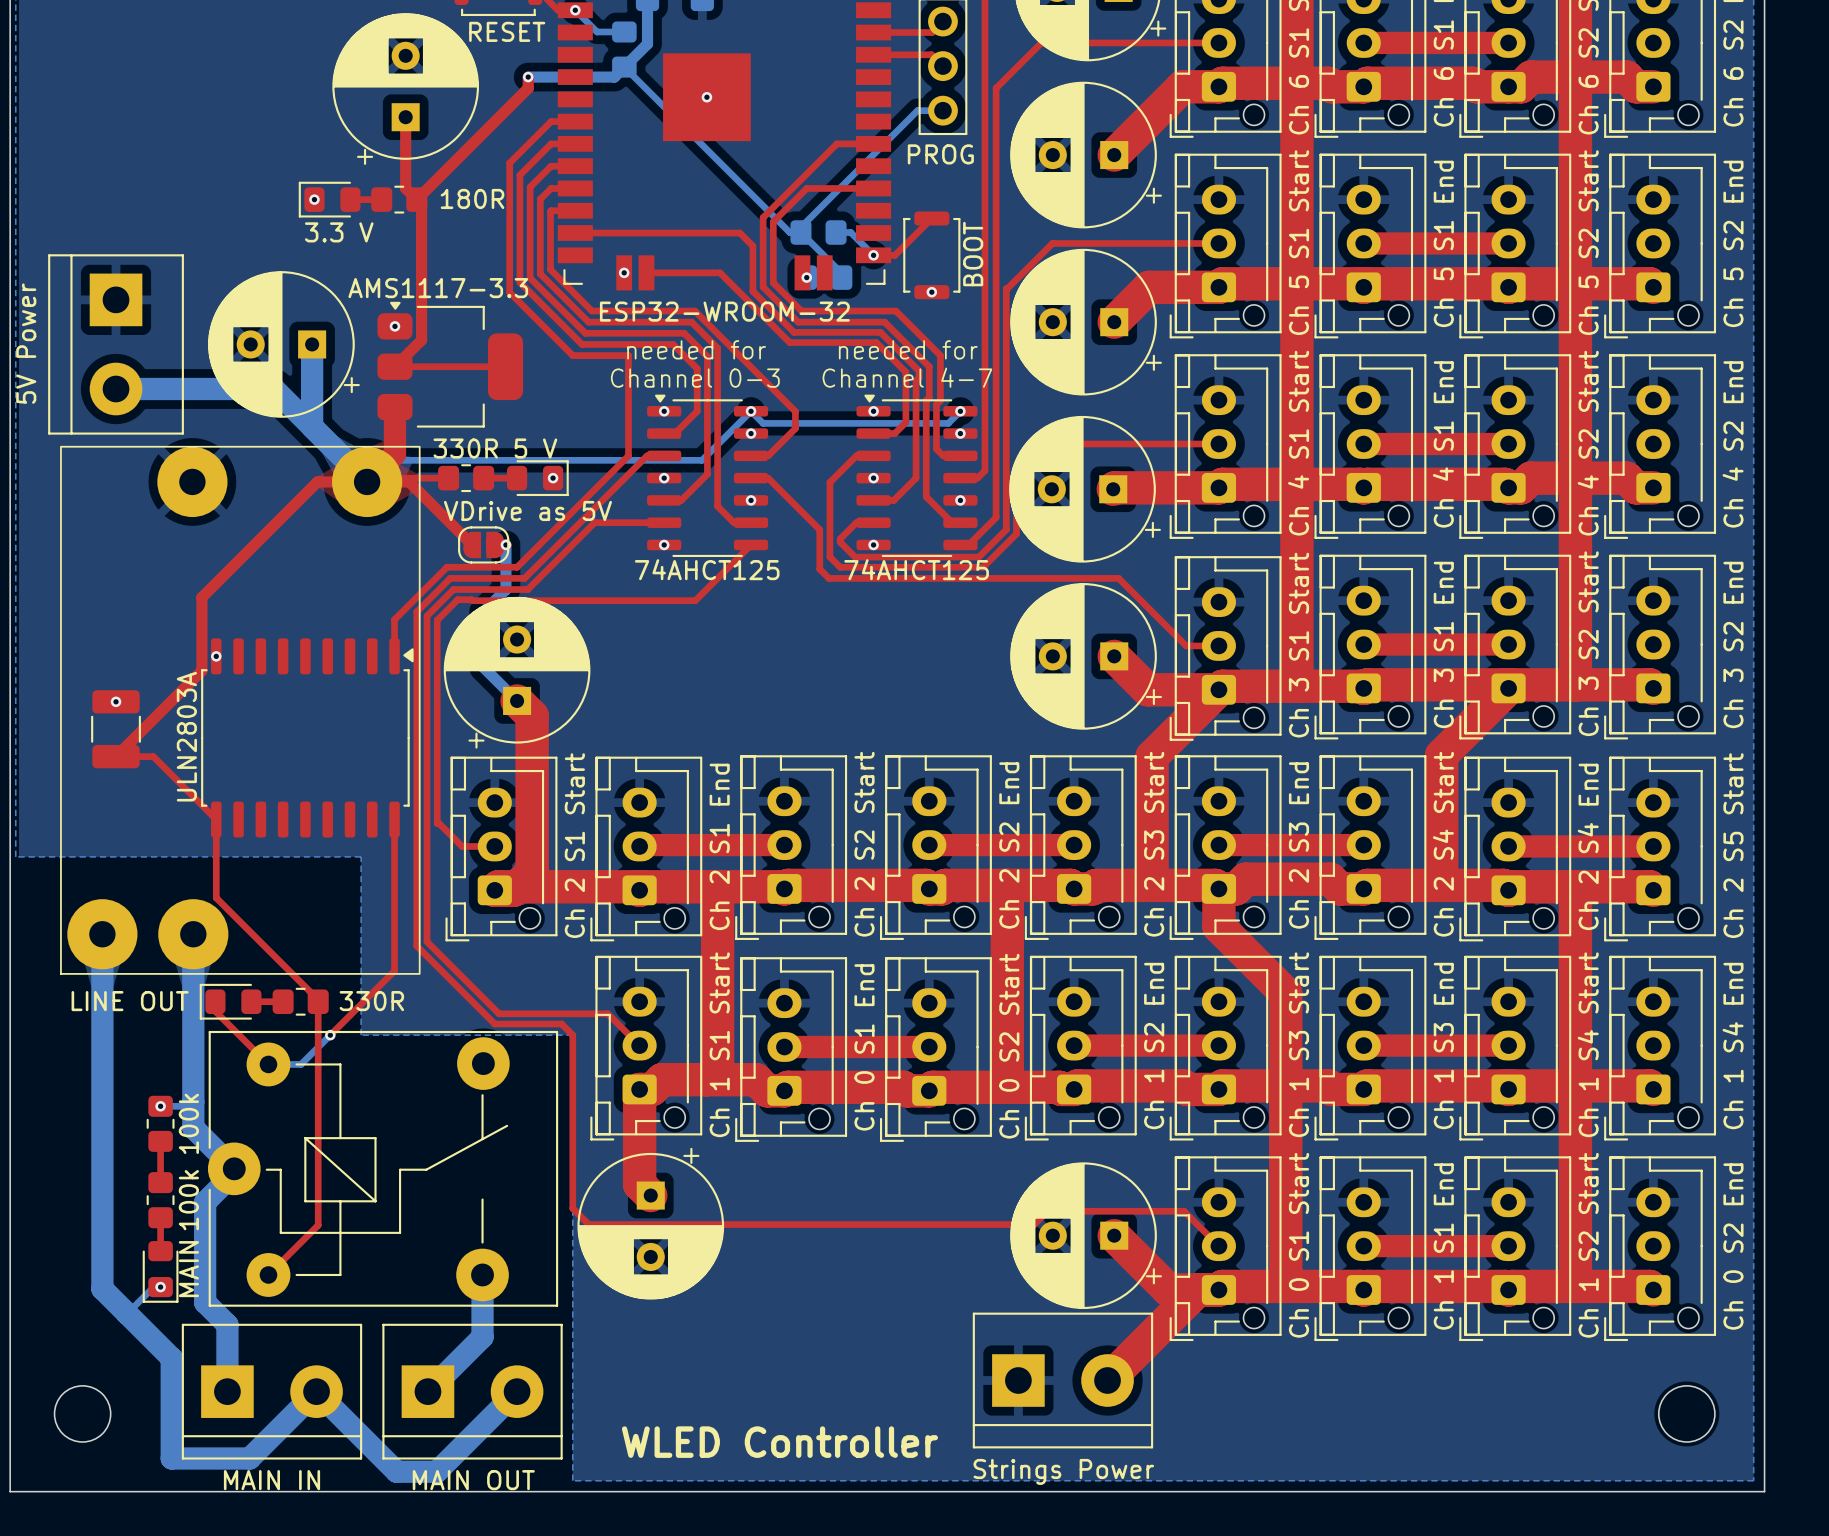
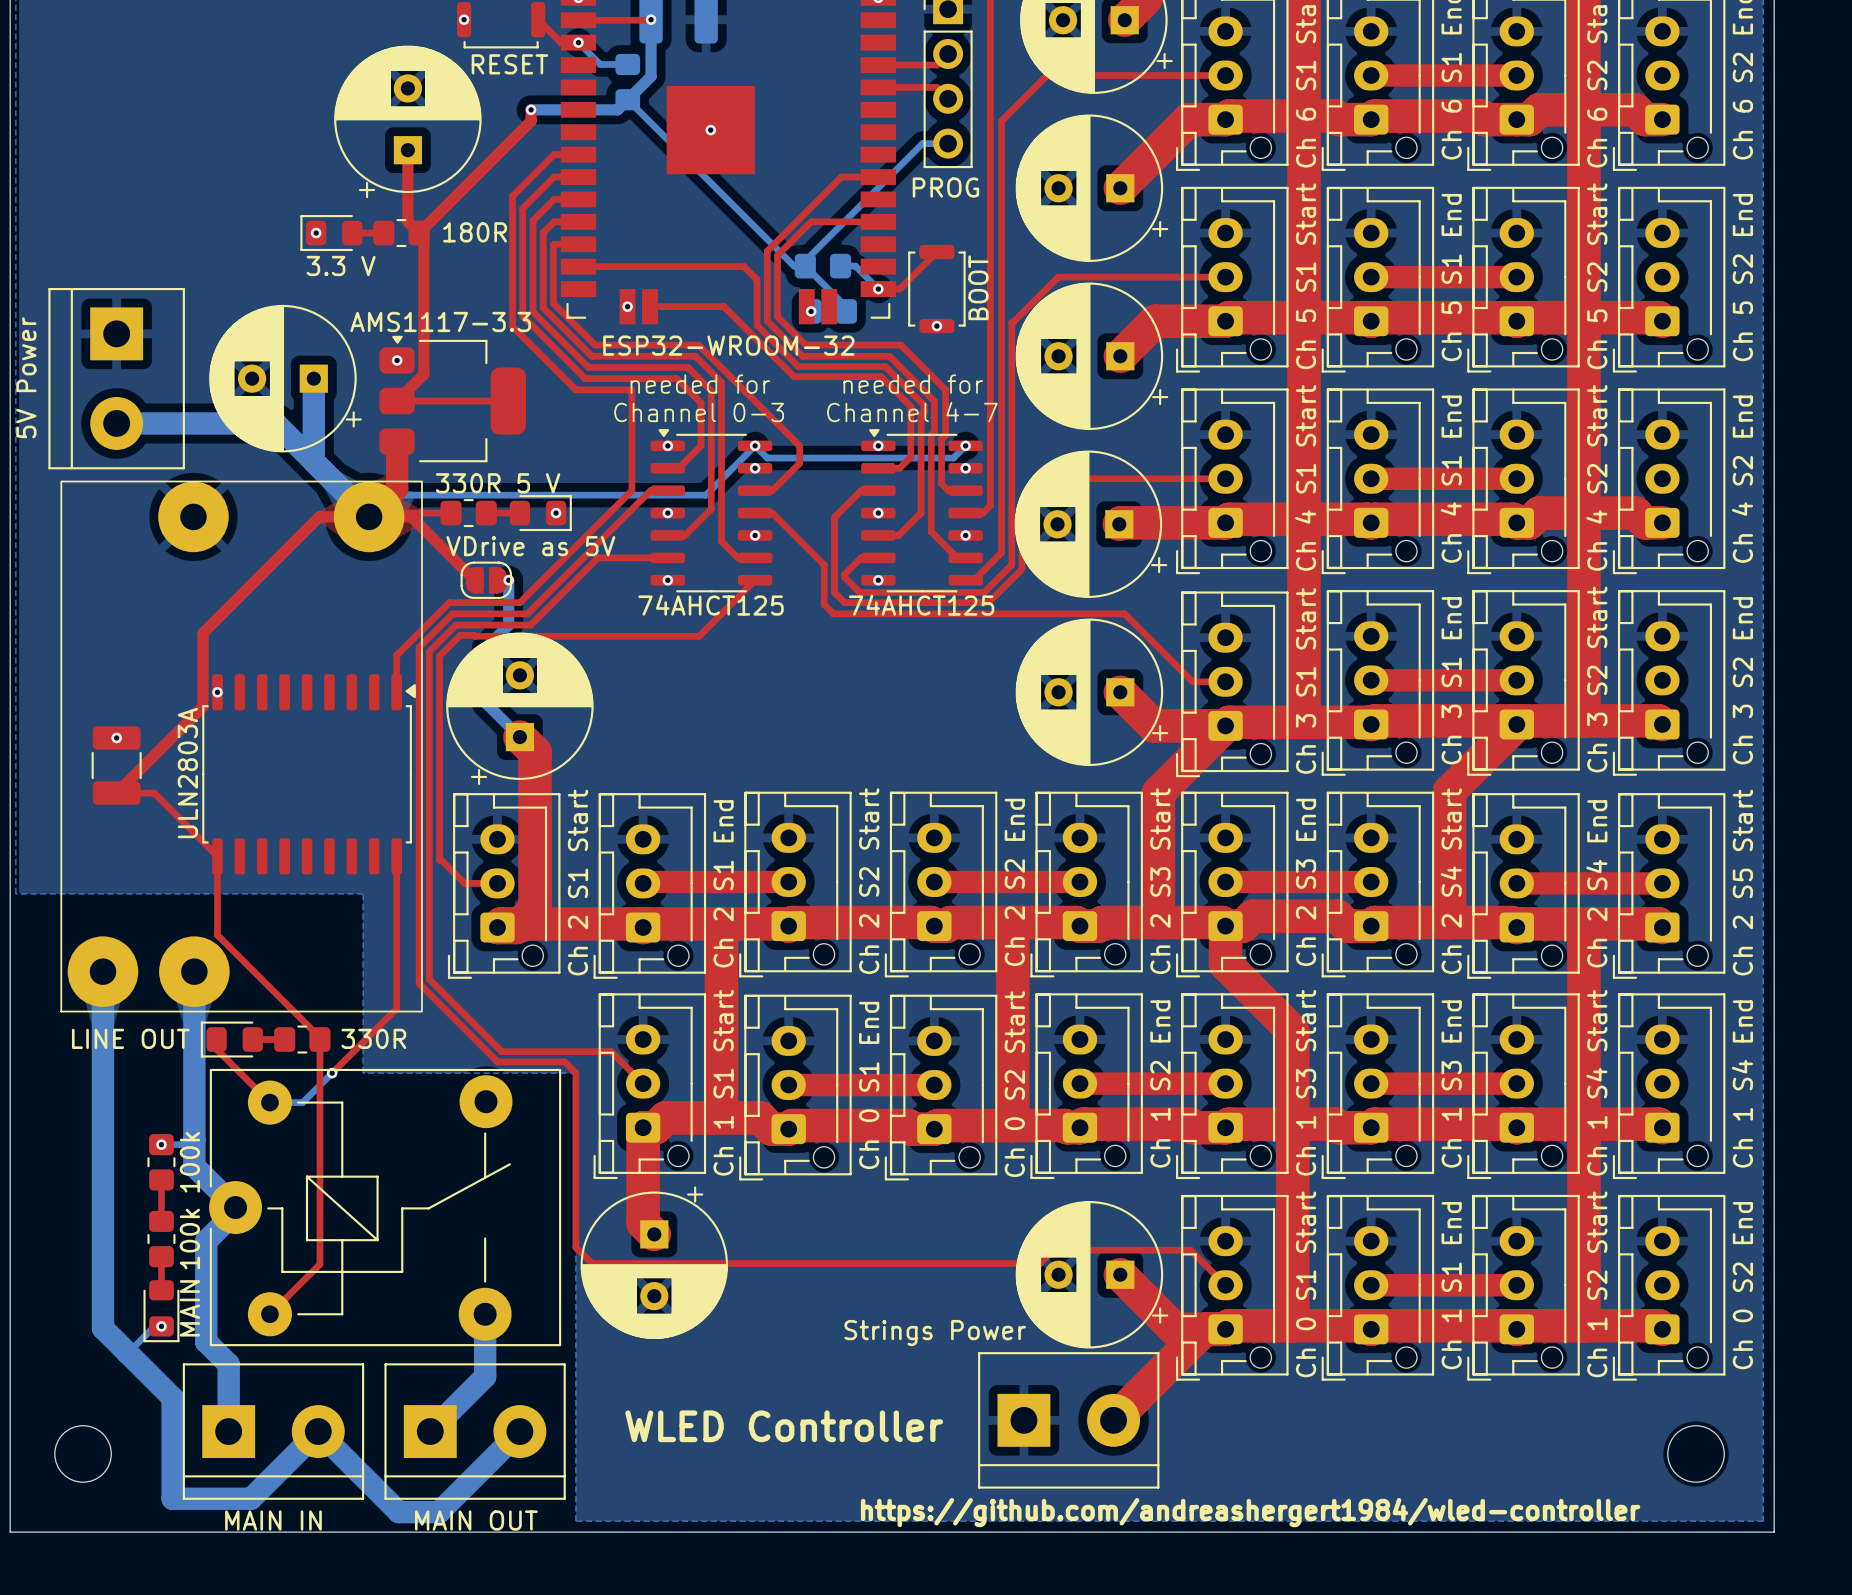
text position: WLED Controller (779, 1442) -> WLED Controller (784, 1426)
part value position: Strings Power (1063, 1471) -> Strings Power (935, 1333)
text: none -> https://github.com/andreashergert1984/wled-controller (1250, 1512)

